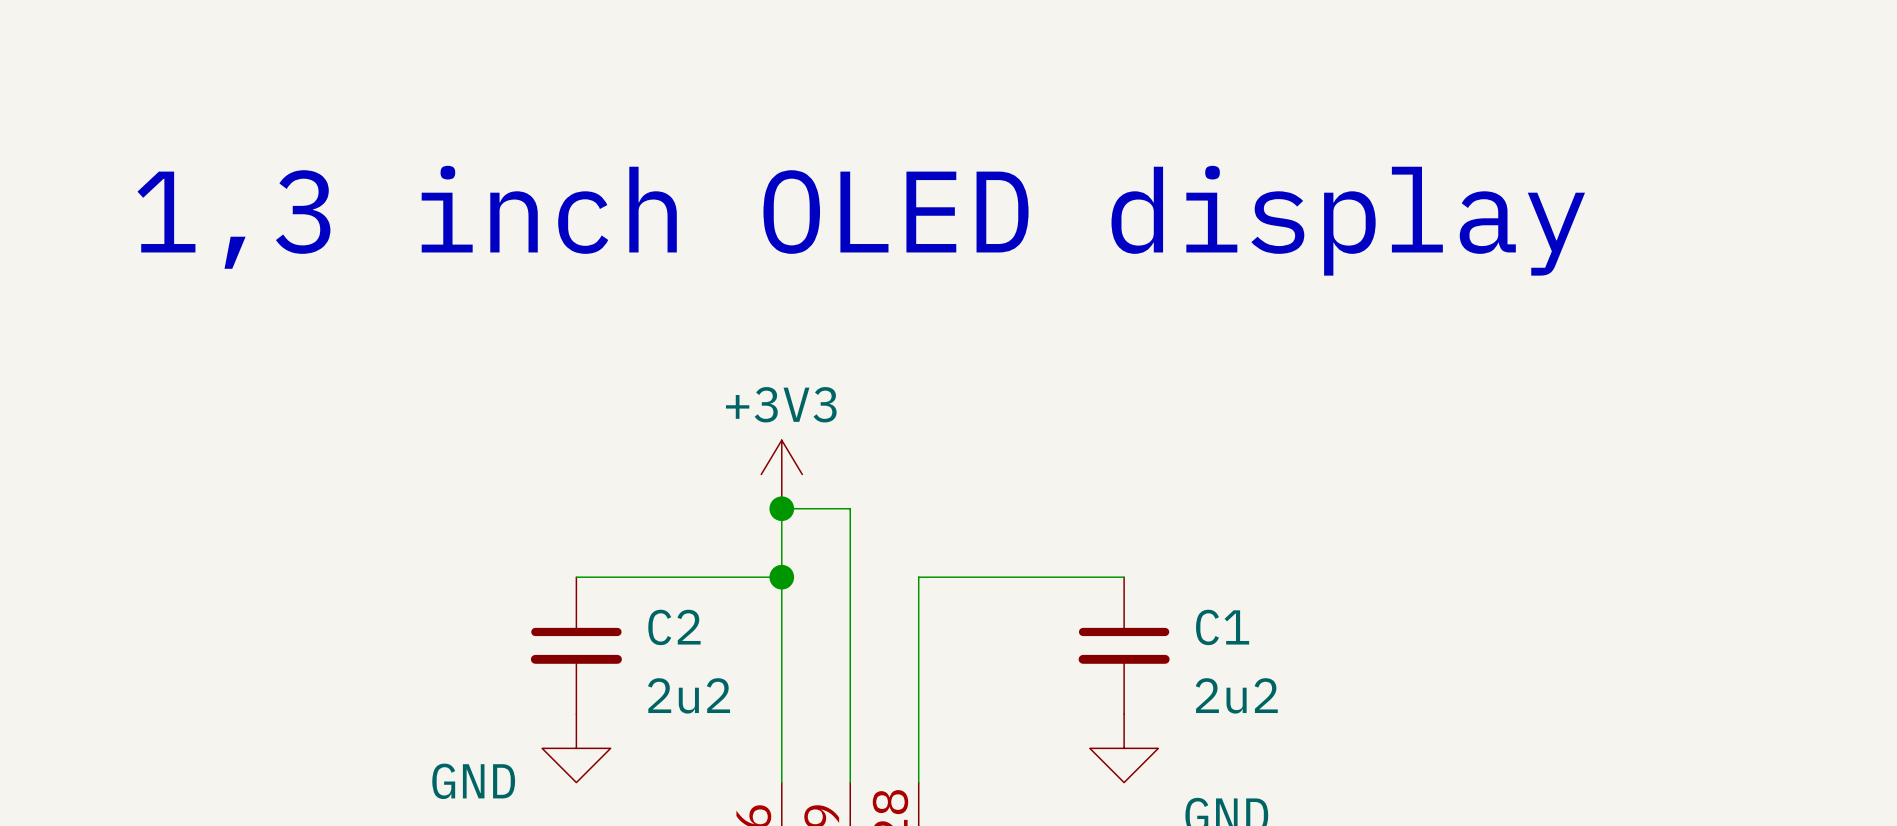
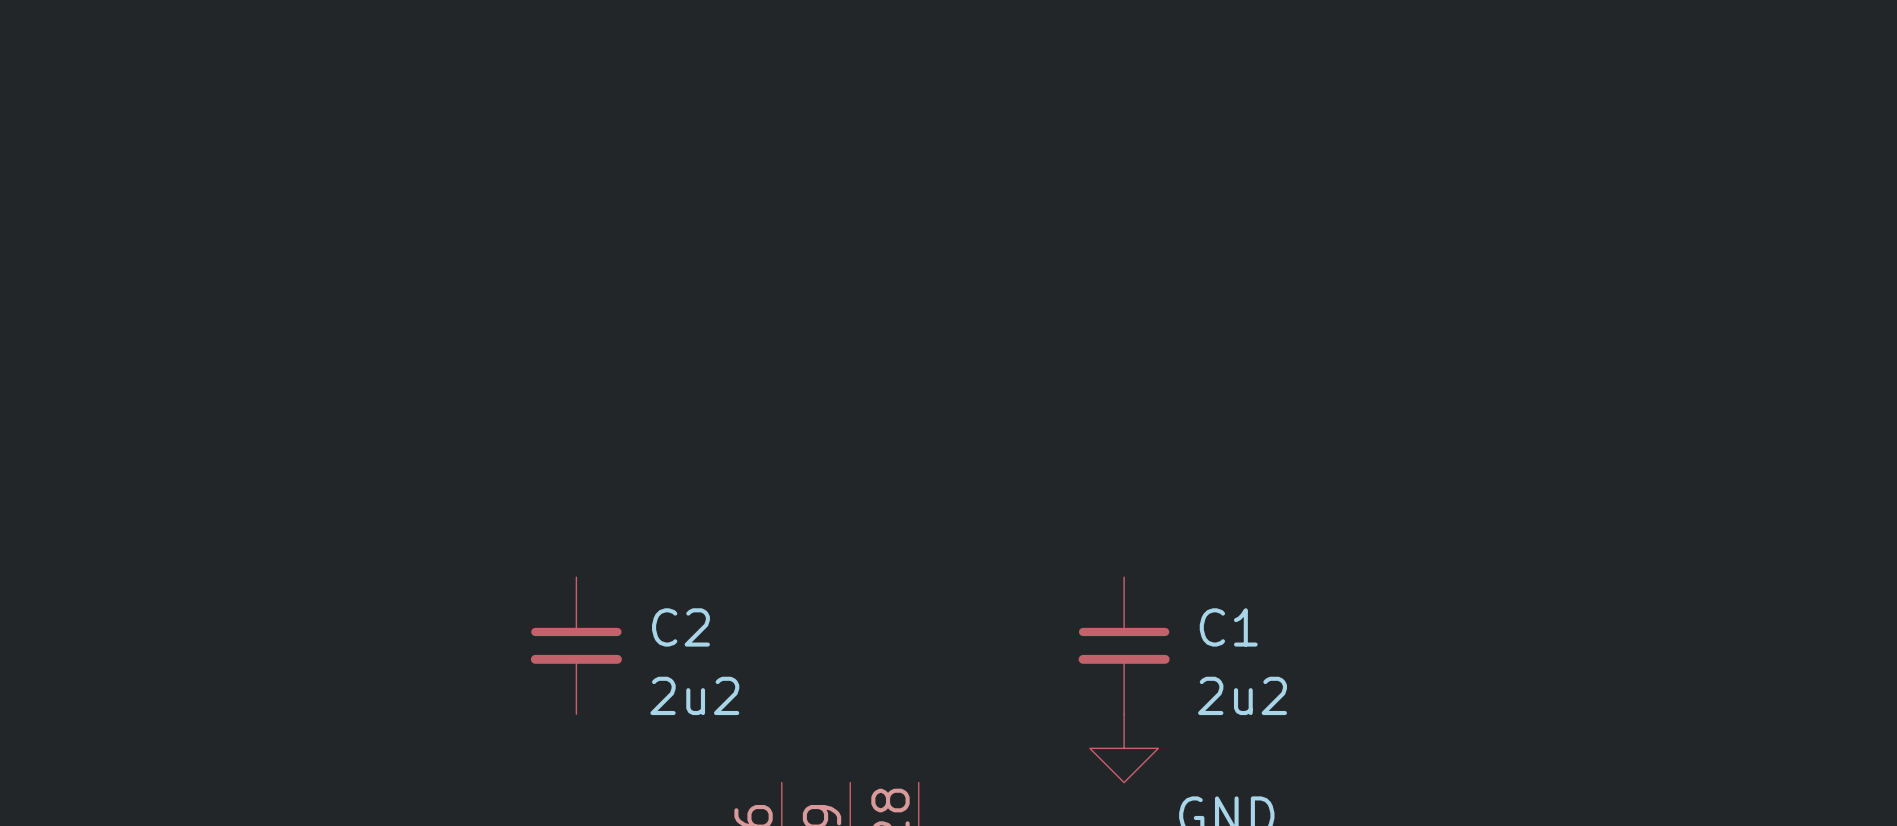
text: 1,3 inch OLED display (861, 220) -> none
power symbol: +3V3 (781, 474) -> none
junction: (781, 508) -> none
wire: (576, 577) (781, 577) -> none
junction: (781, 577) -> none
wire: (1124, 577) (918, 577) (918, 782) -> none
power symbol: GND (576, 748) -> none
wire: (781, 782) (781, 508) (850, 508) (850, 782) -> none

